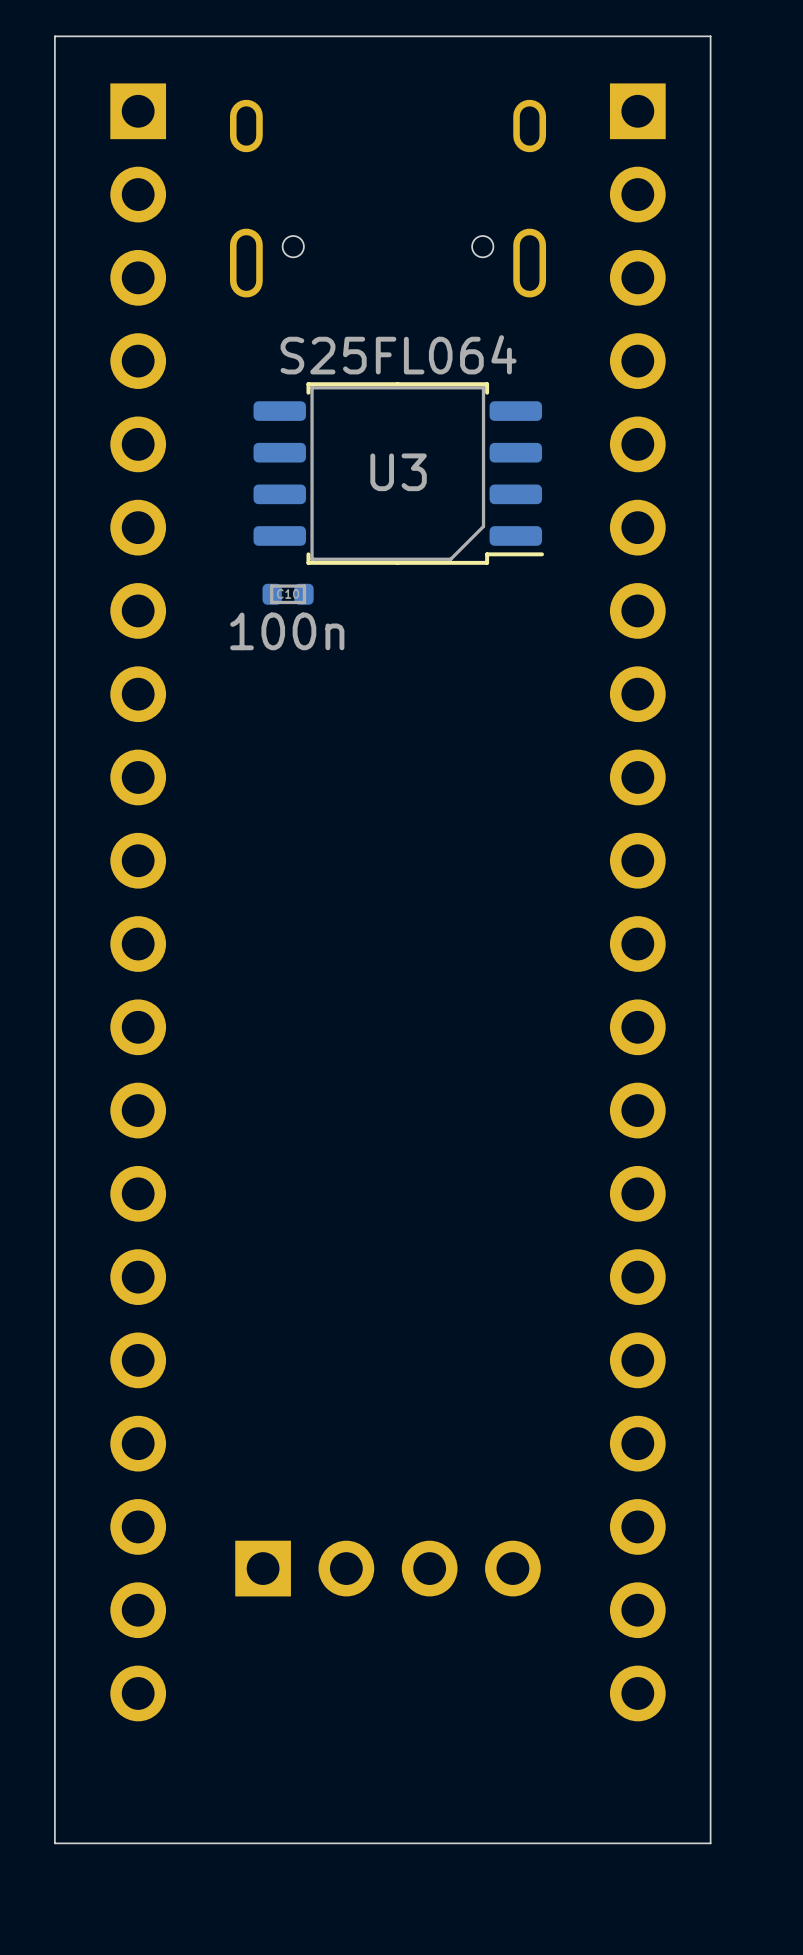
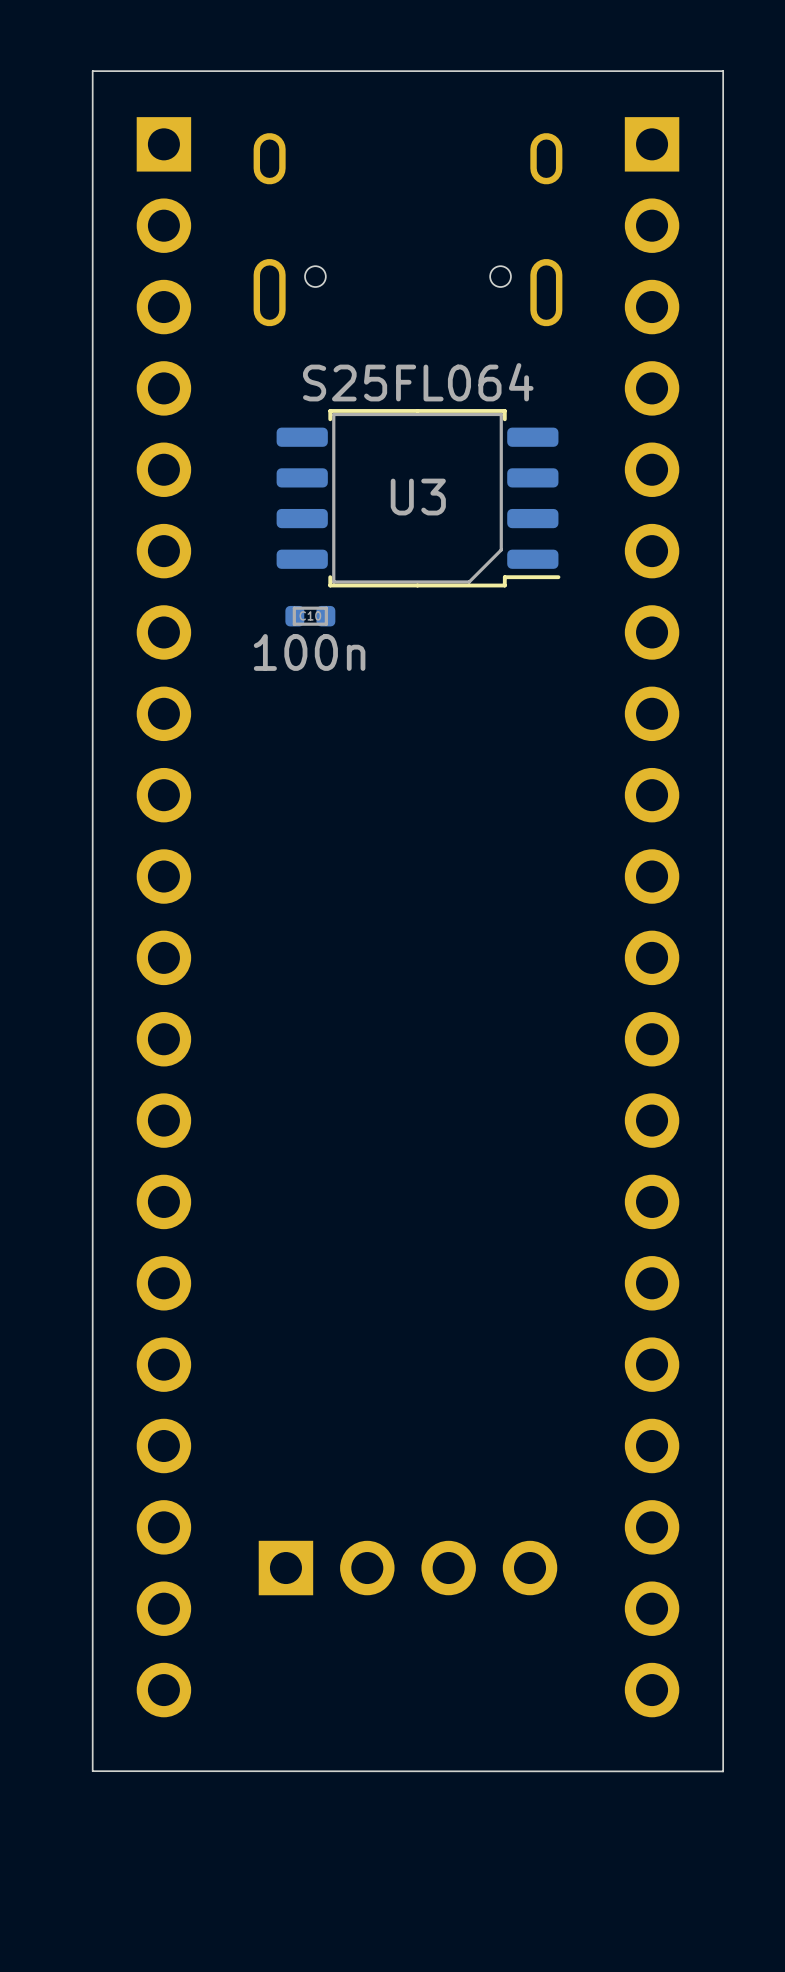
board edge: (65, 36) (54, 36) (54, 1843) (710, 1843) (710, 1776) -> (92, 71) (92, 1771) (723, 1771)

